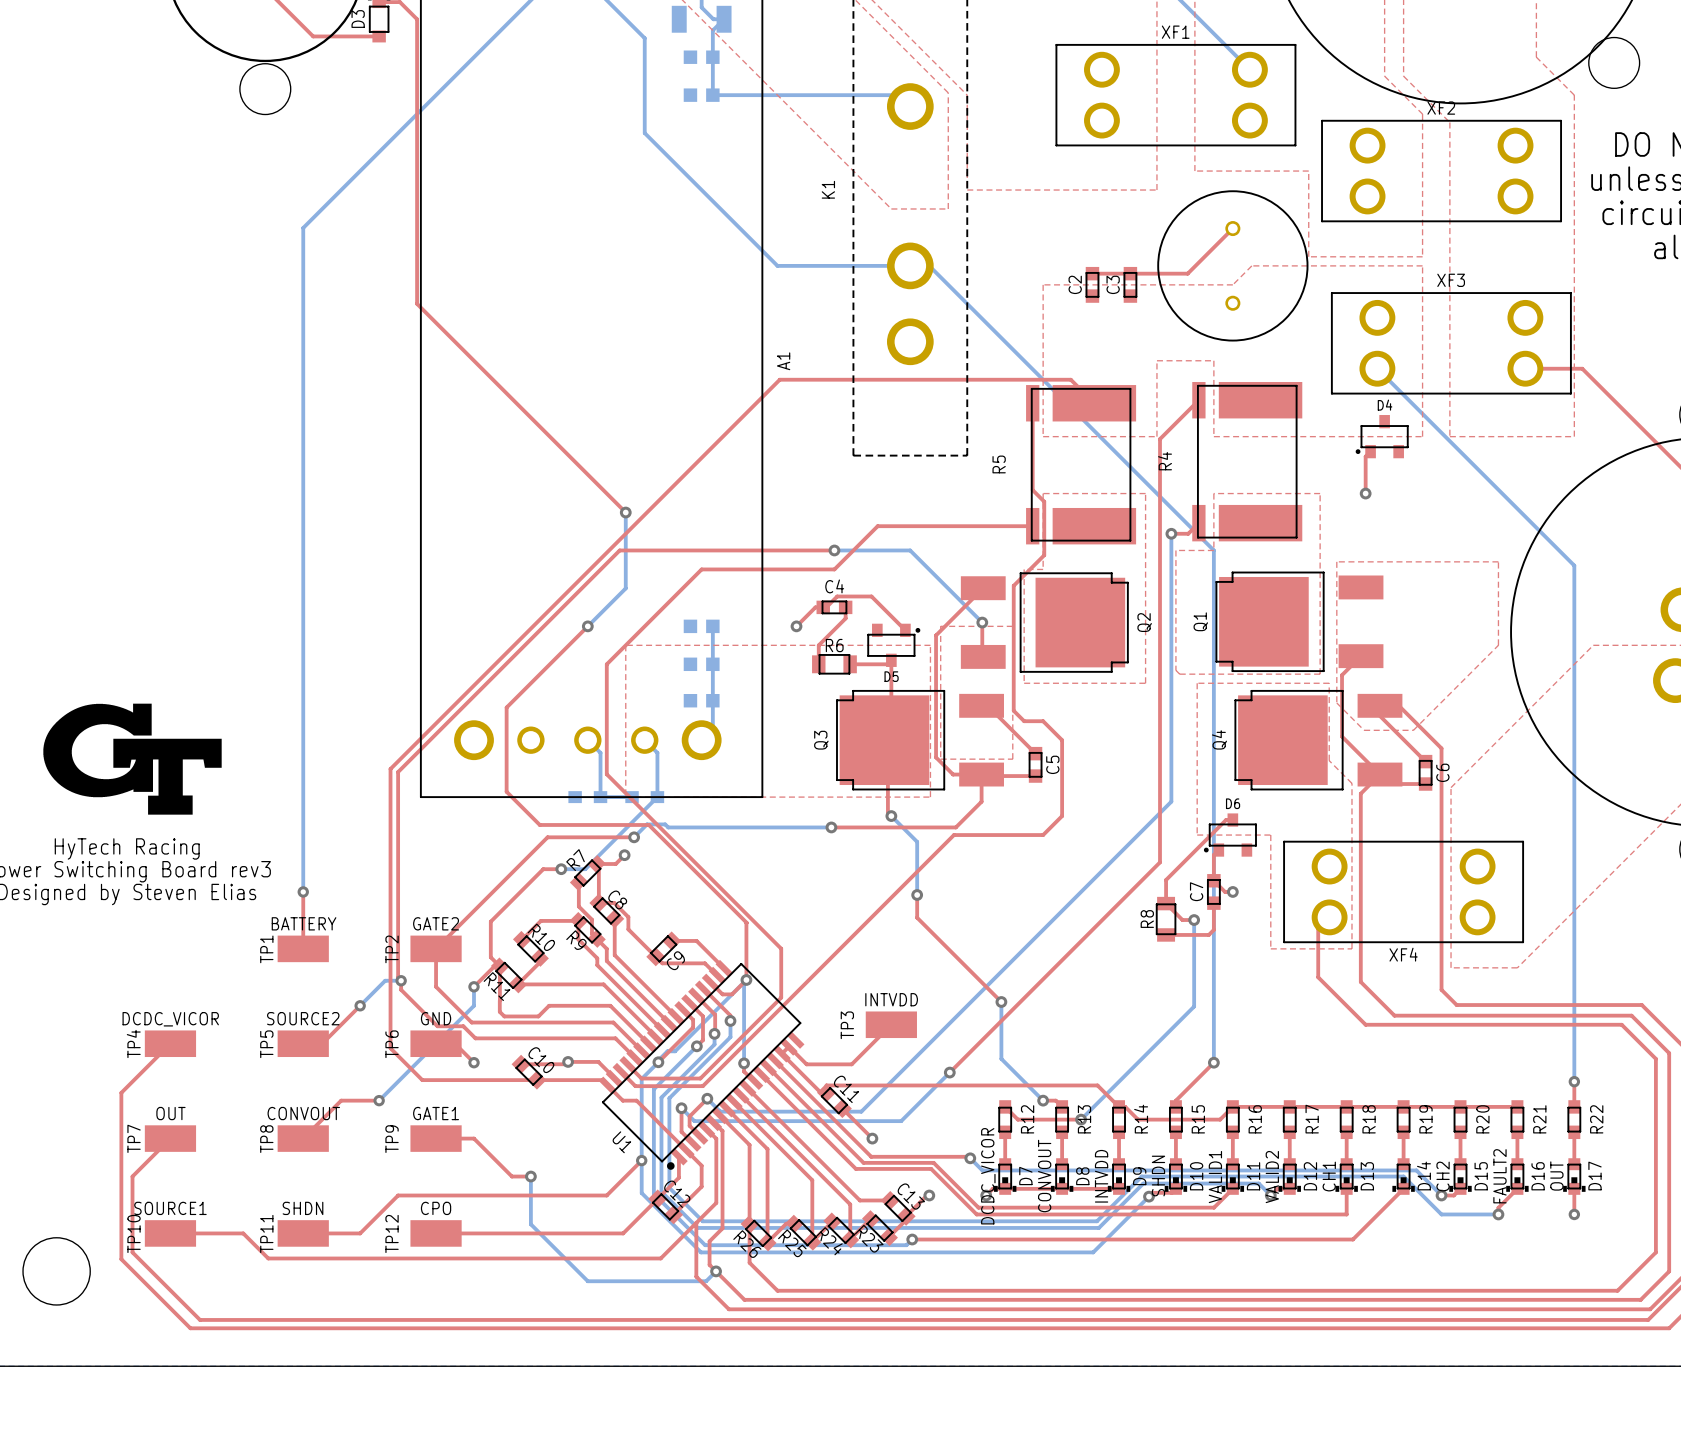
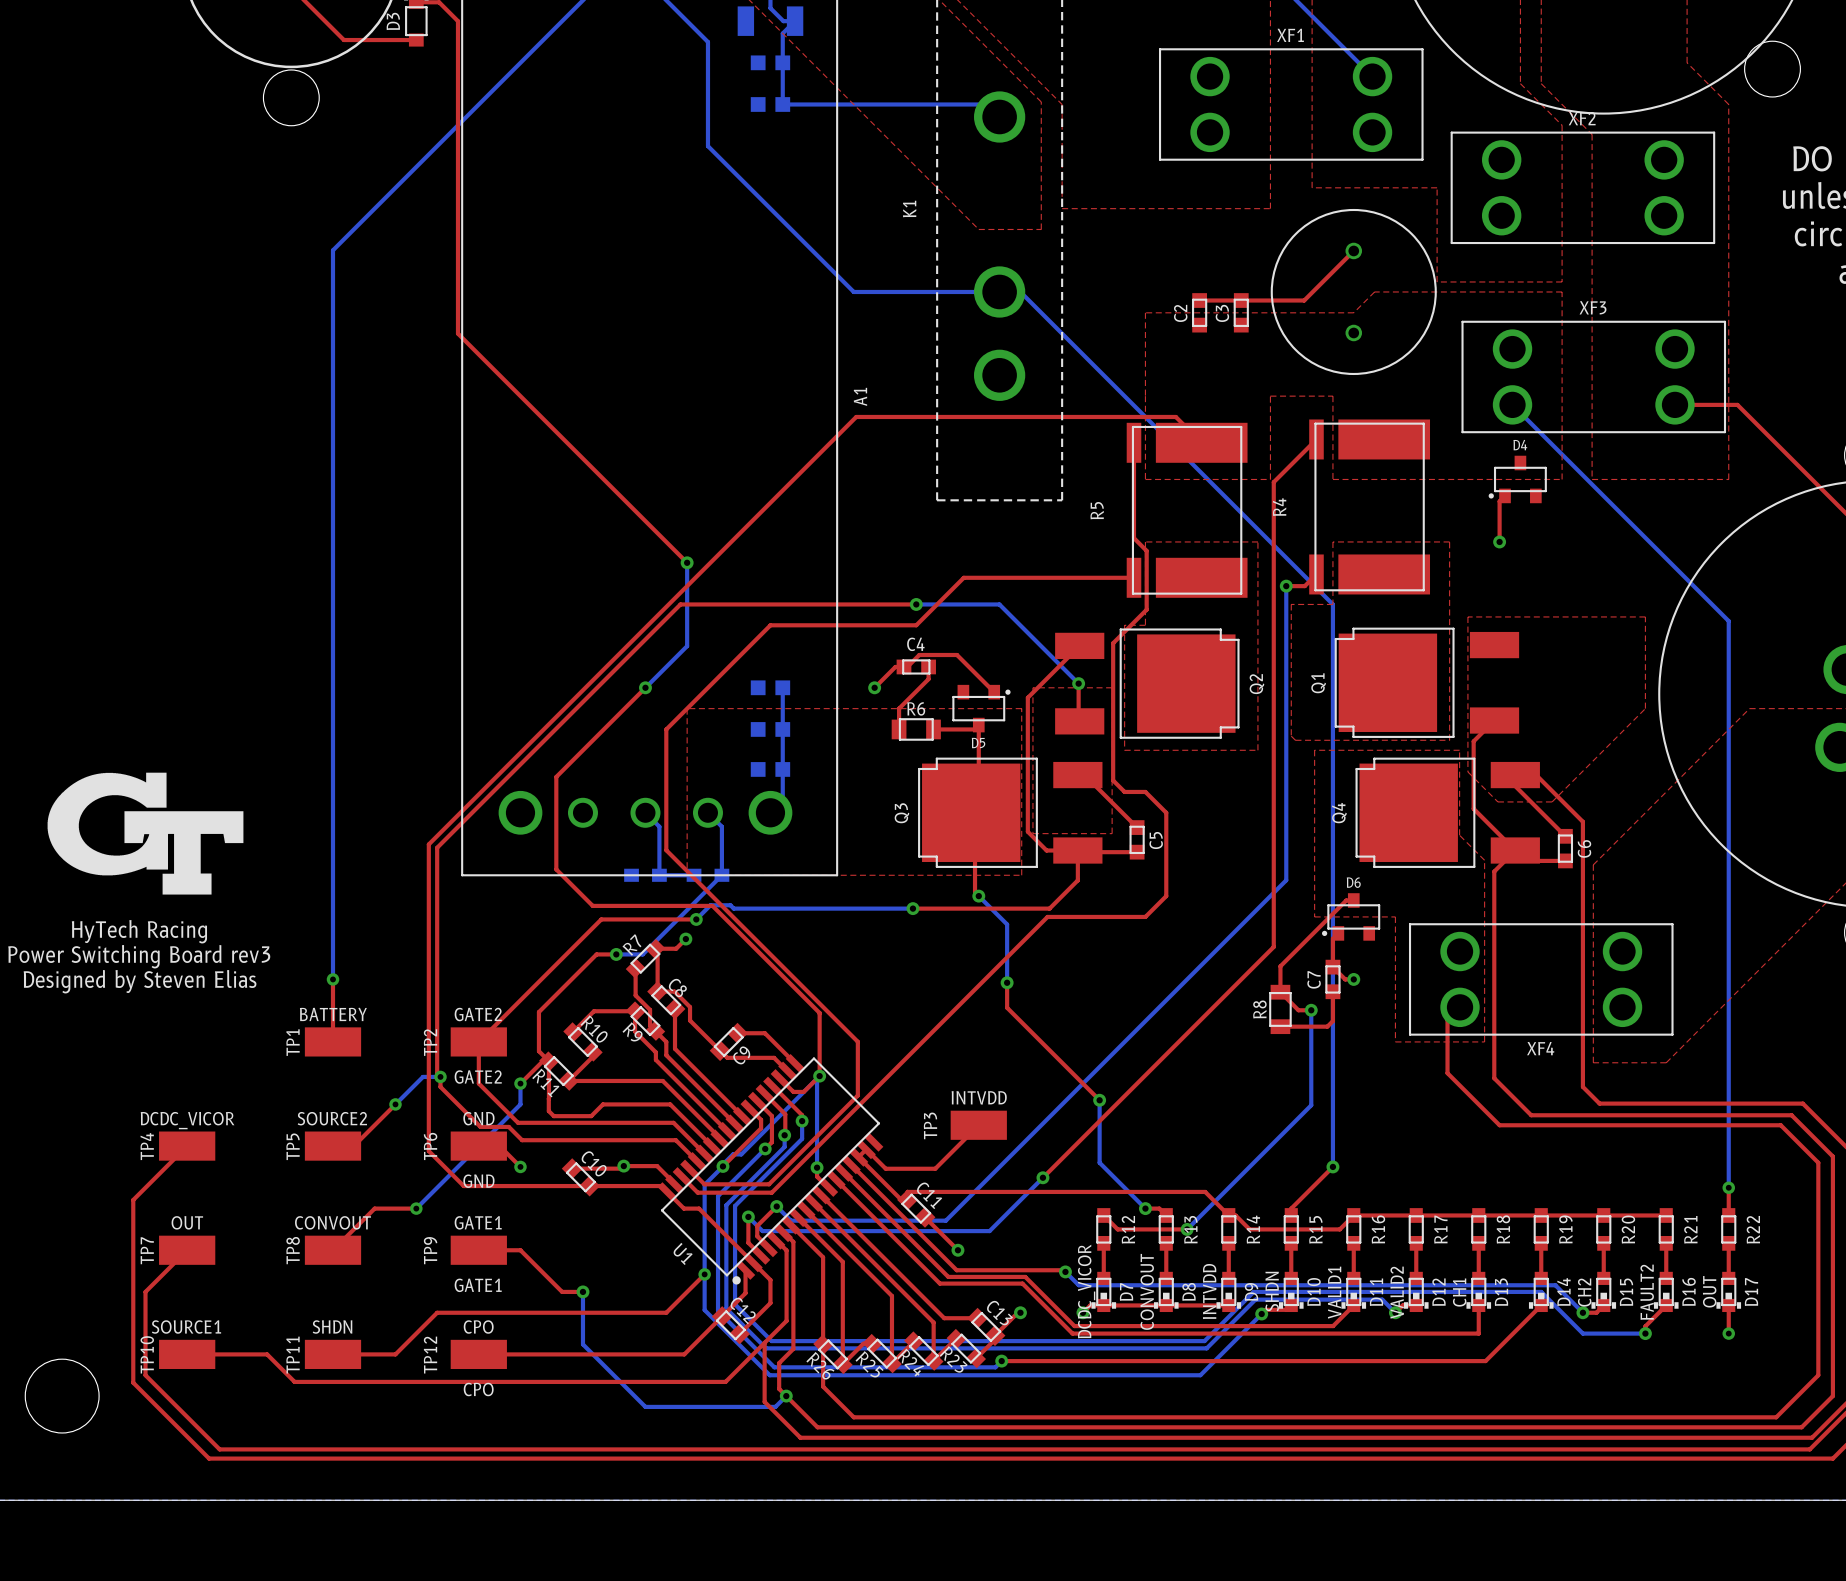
text: none -> GATE2 (478, 1077)
text: none -> GND (478, 1181)
text: none -> GATE1 (478, 1285)
text: none -> CPO (478, 1389)

